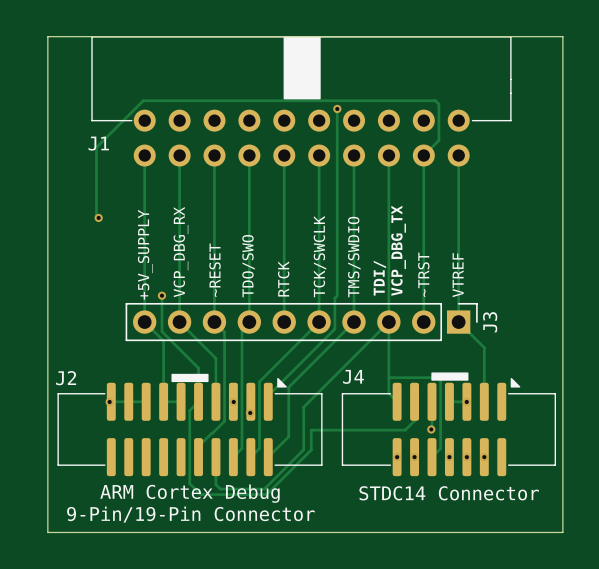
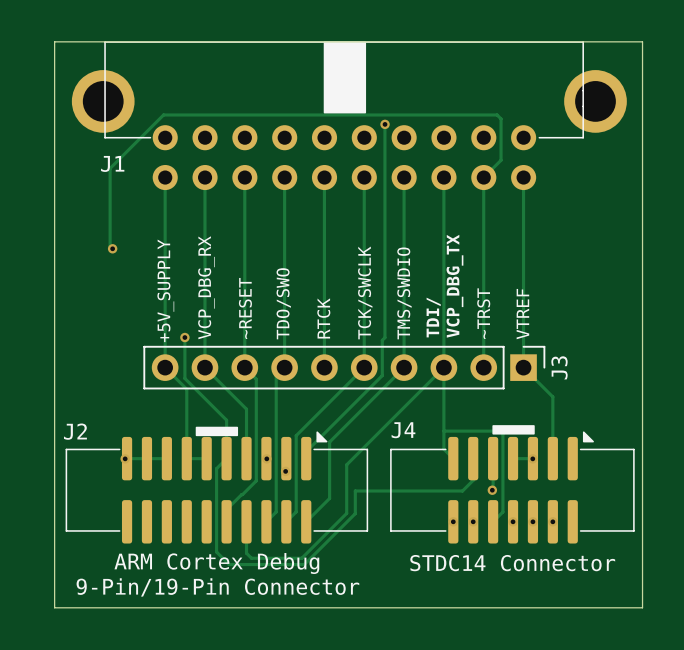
part: none -> (103, 101)
part: none -> (595, 101)

